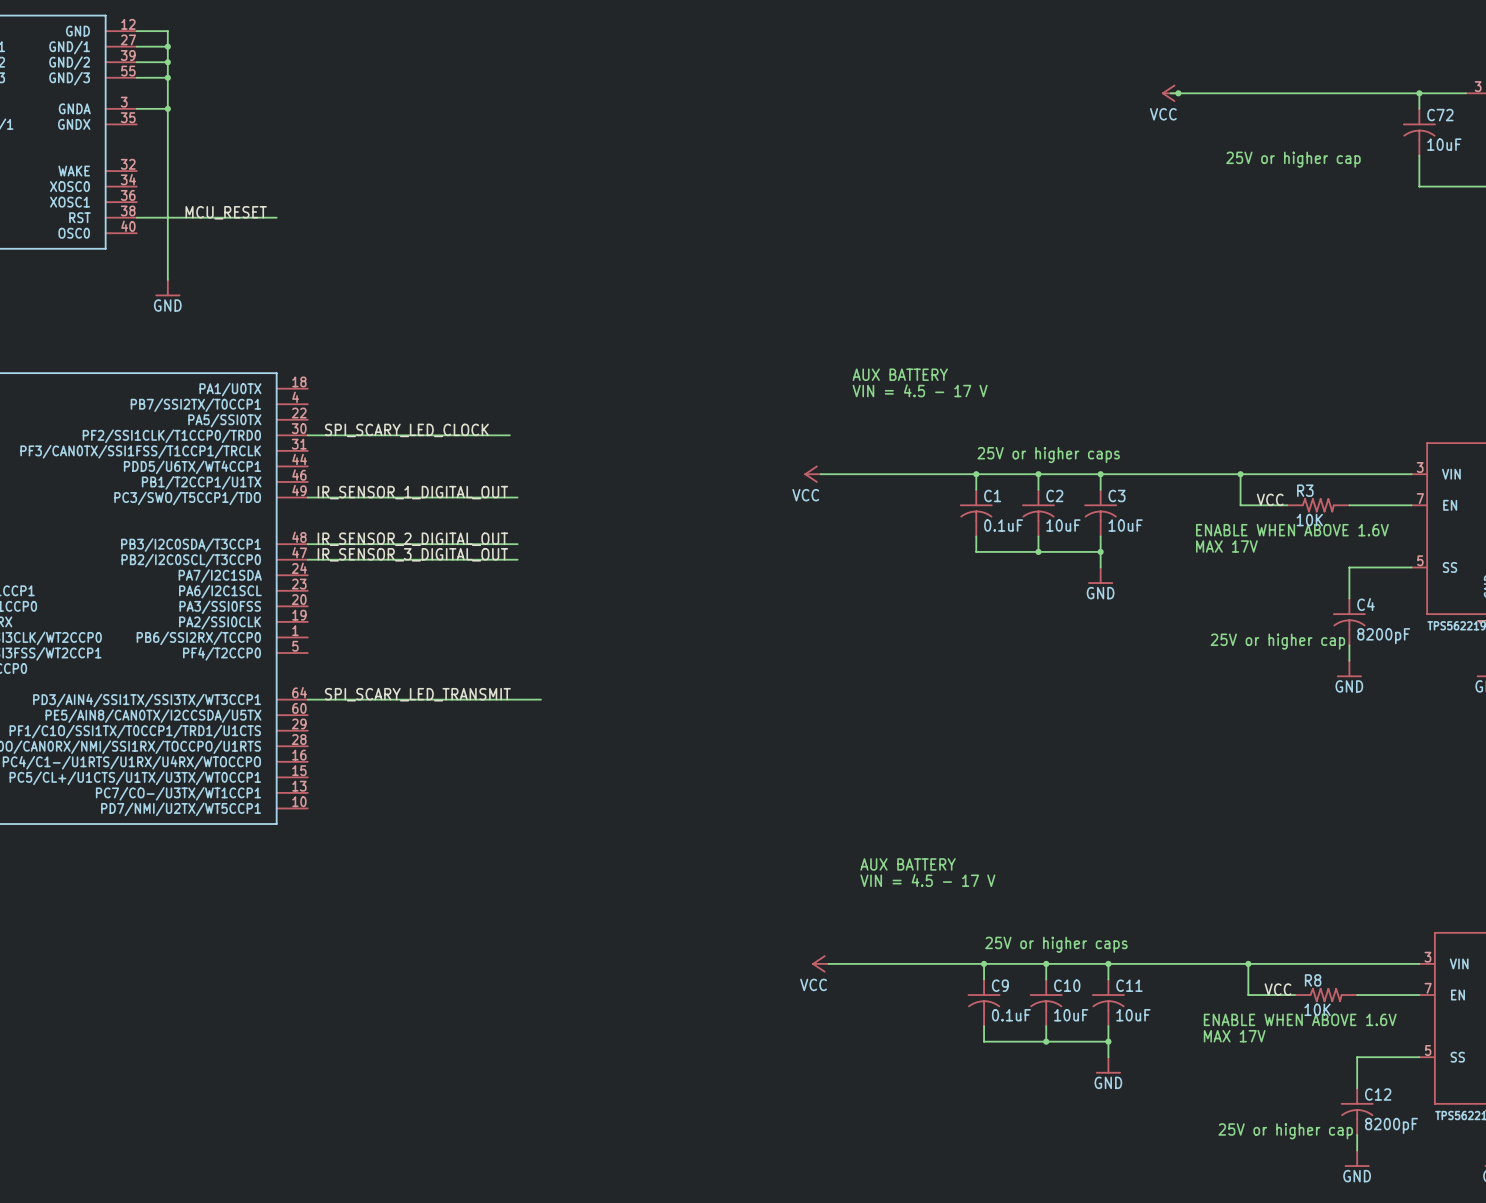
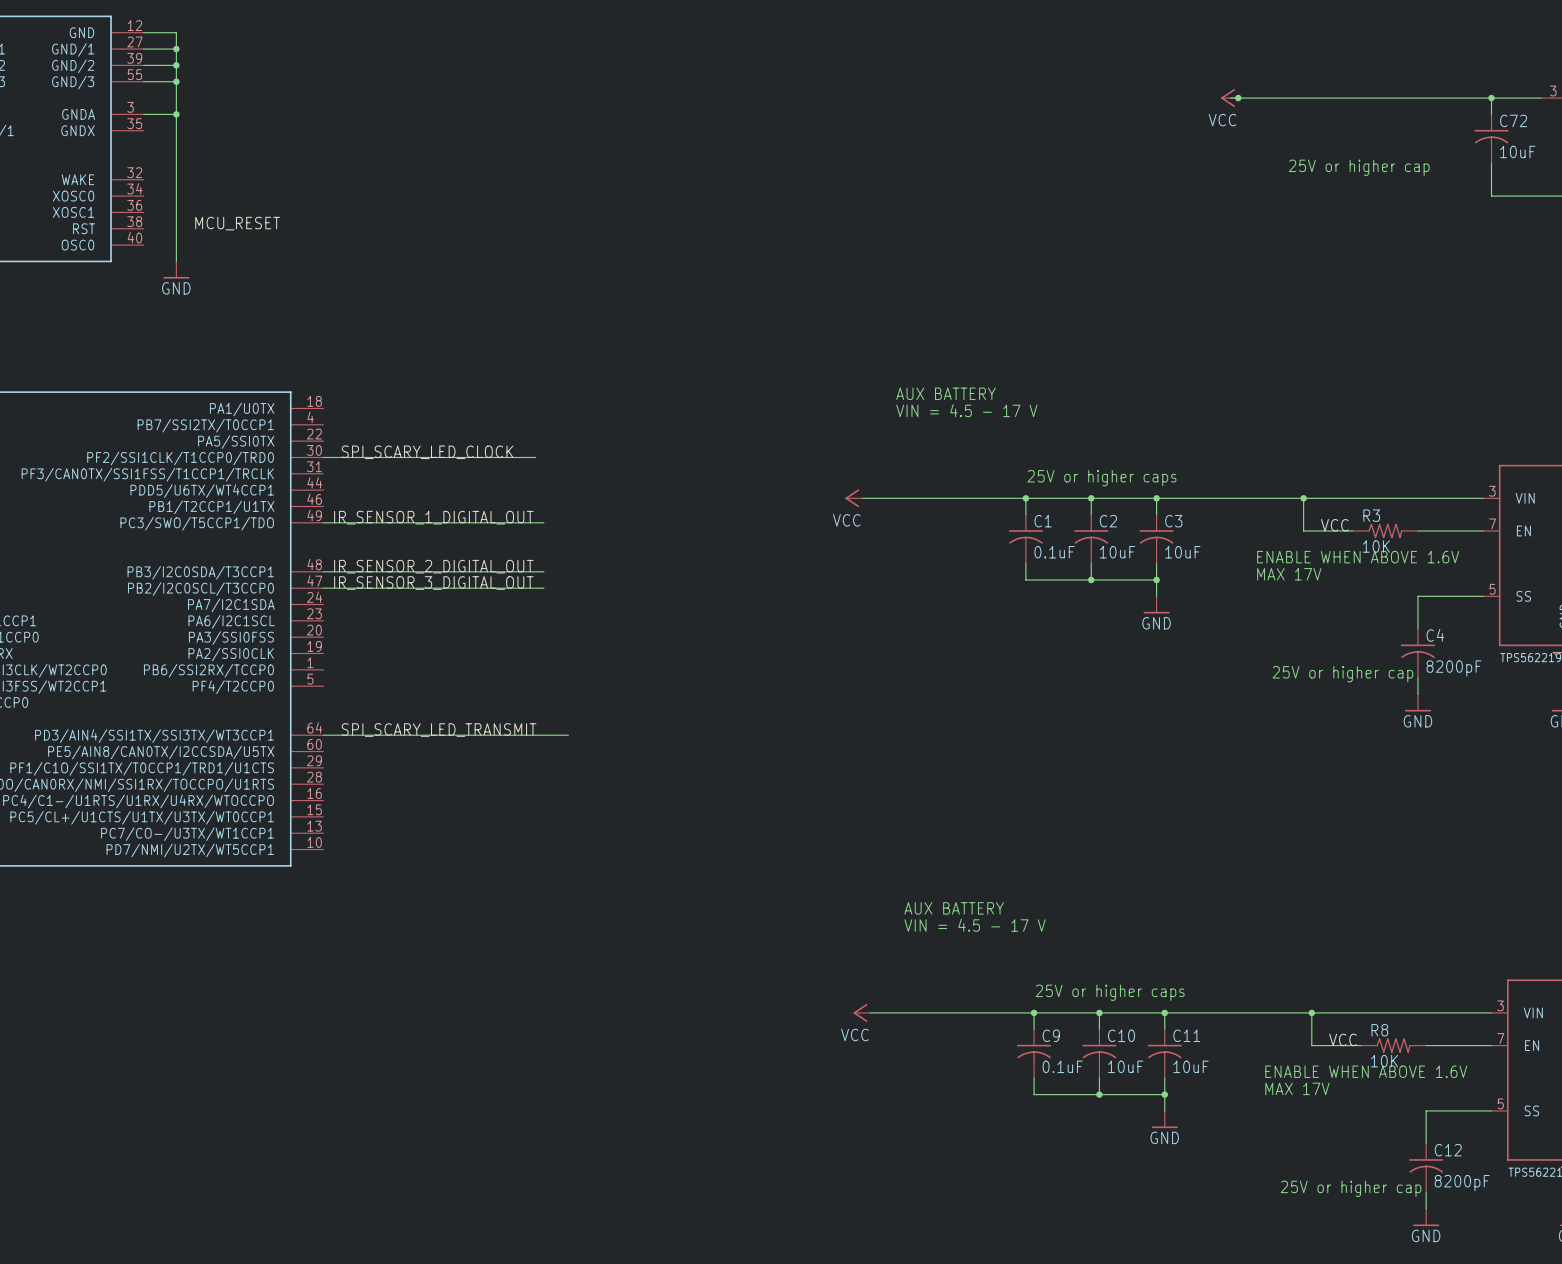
wire: (136, 217) (276, 217) -> none
power symbol position: GND (167, 288) -> GND (176, 270)

